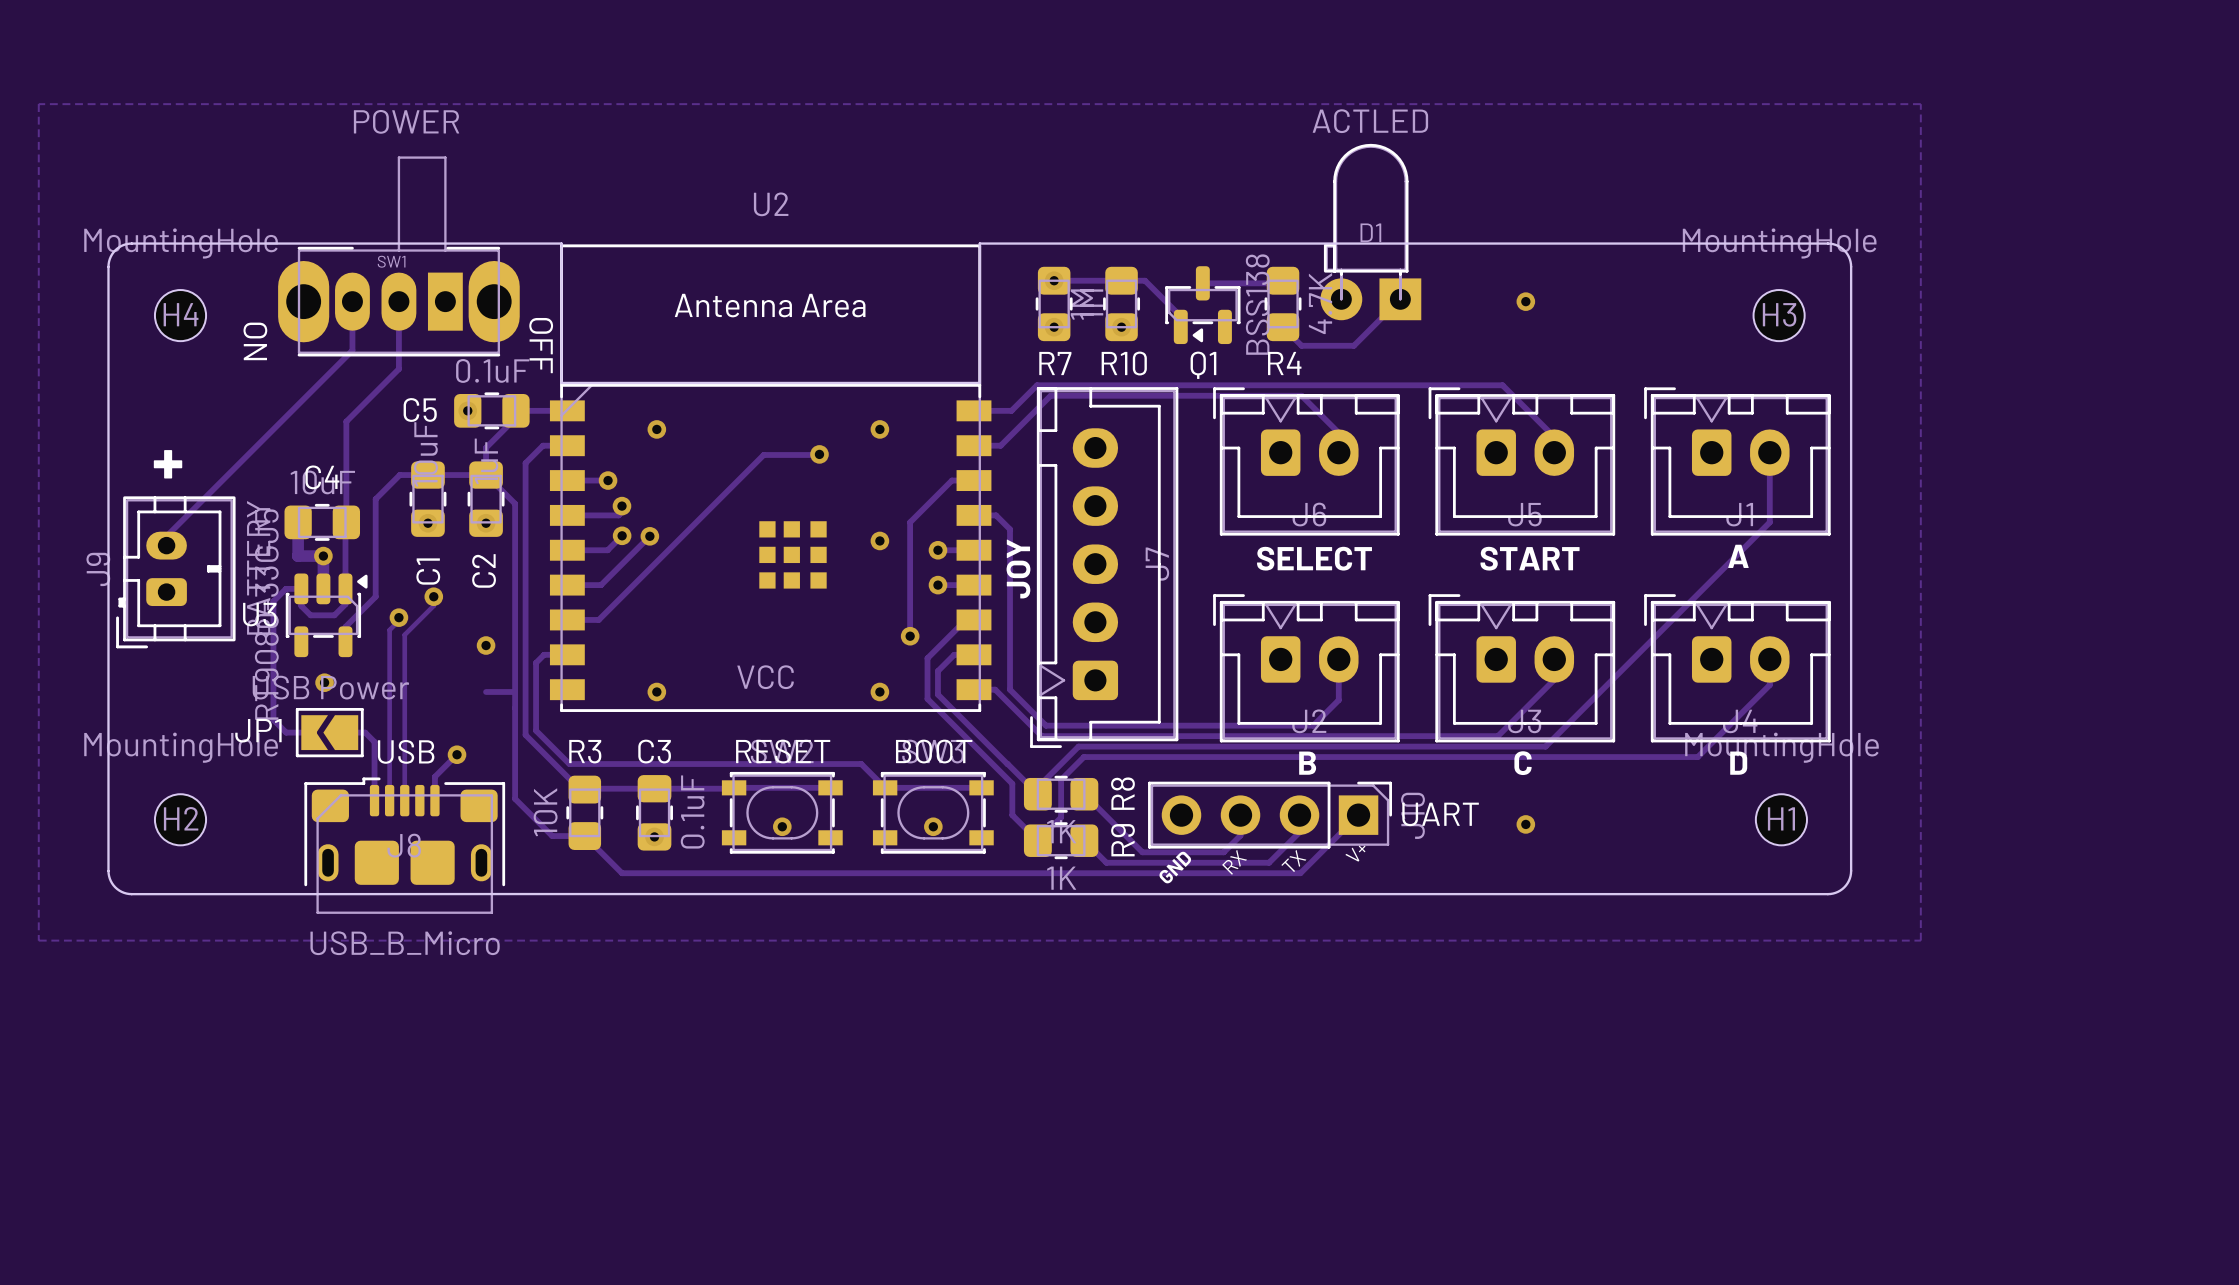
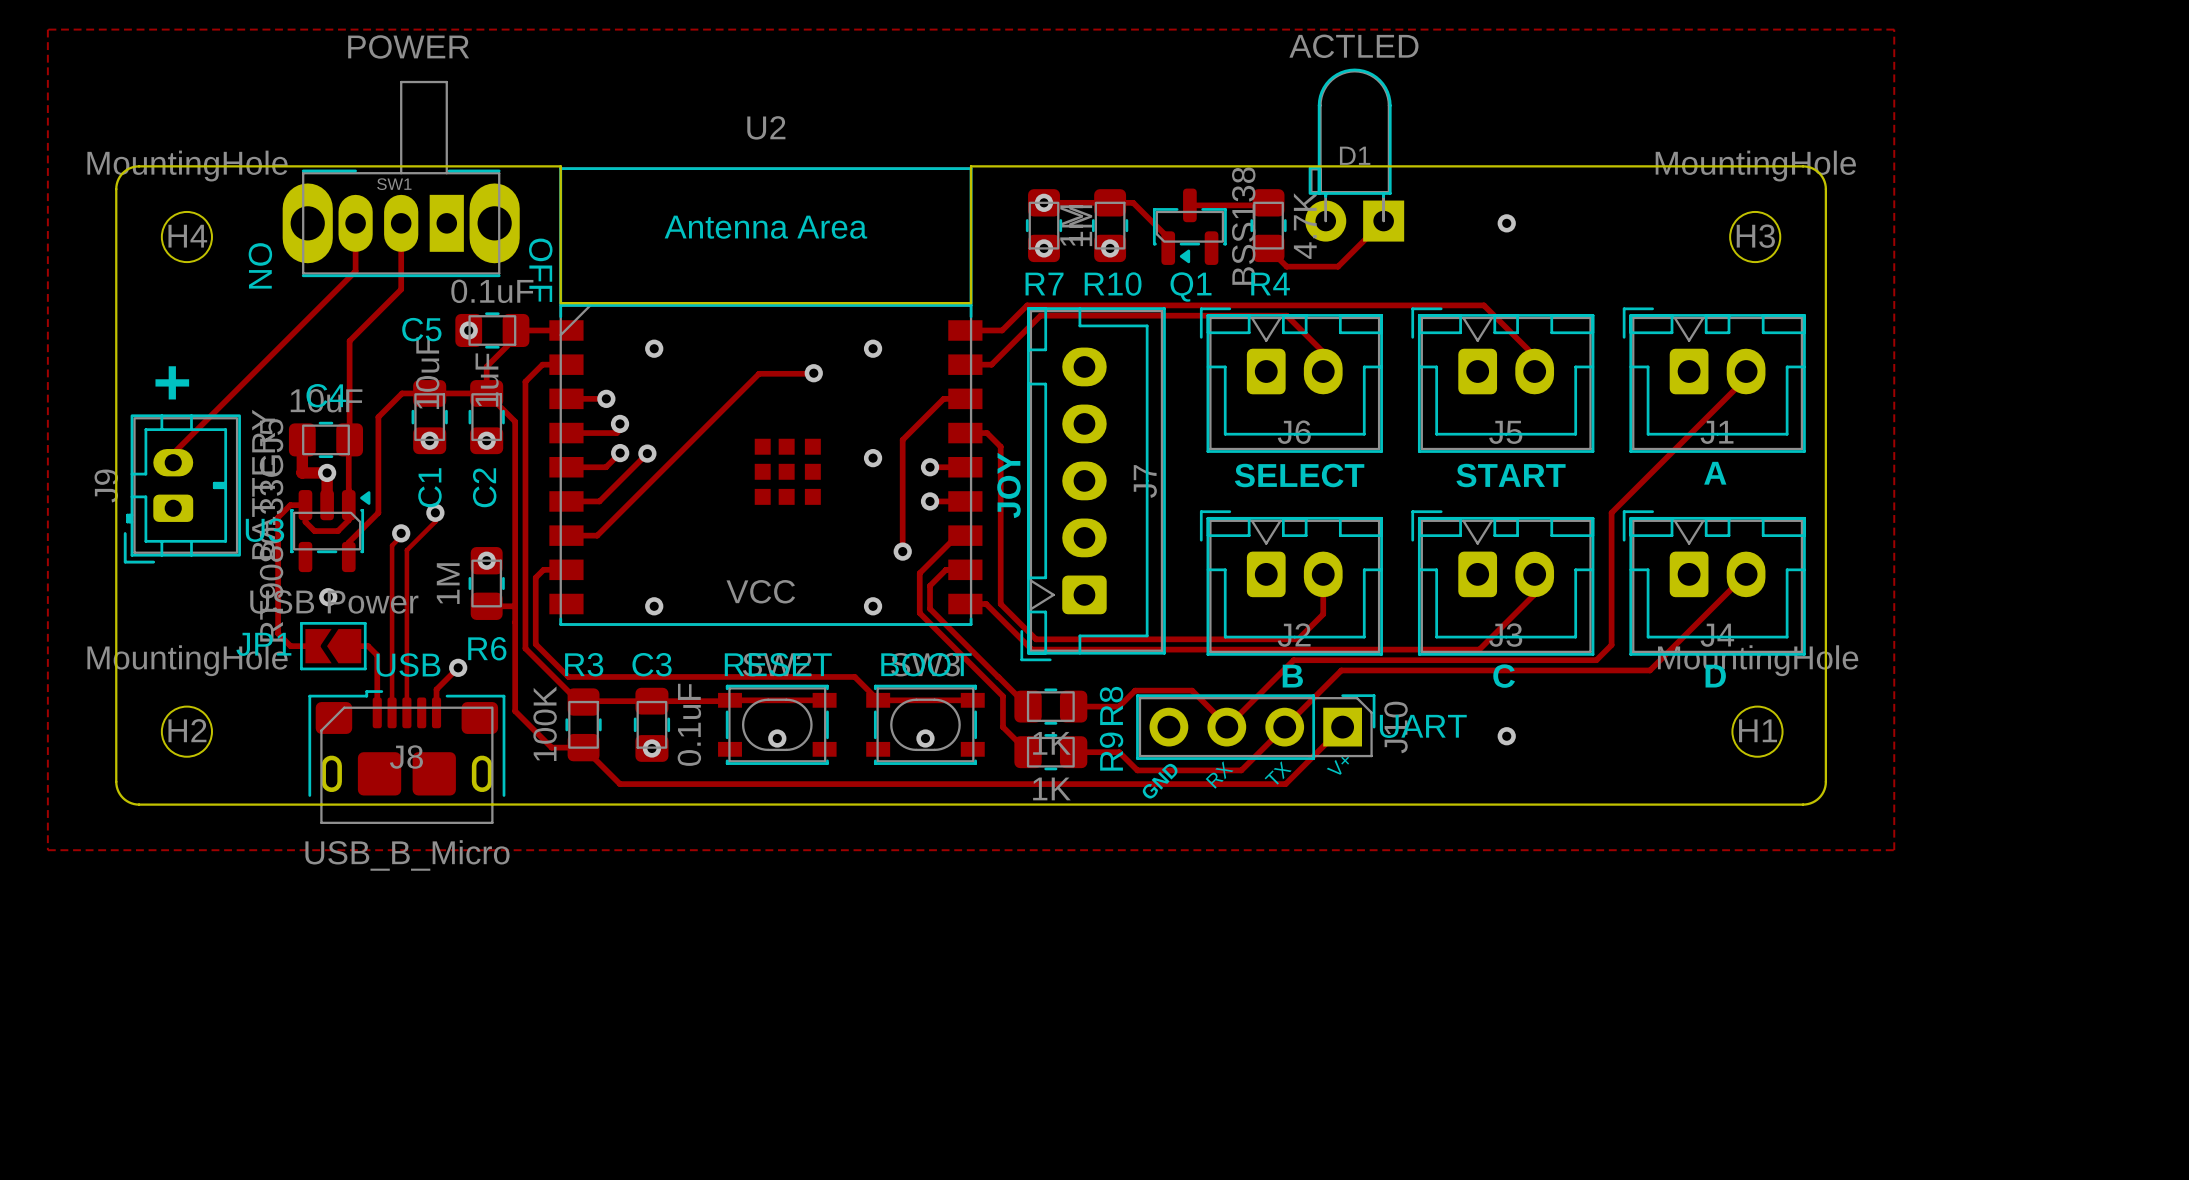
track: (1769, 459) (1769, 522) (1545, 746) (1078, 746) (1037, 787) (1037, 794) -> (1746, 378) (1611, 512) (1611, 645) (1596, 660) (1293, 660) (1226, 727) (1192, 690) (1135, 690) (1119, 706) (1073, 706)
track: (1769, 659) (1769, 685) (1697, 757) (1083, 757) (1061, 779) (1061, 817) (1037, 840) -> (1746, 574) (1650, 670) (1341, 670) (1241, 770) (1137, 770) (1130, 763)
R6: none -> 1M (486, 583)
track: (1084, 794) (1130, 840) -> (1073, 752) (1119, 752)
R3 value: 10K (545, 812) -> 100K (545, 723)
track: (1240, 815) (1240, 835) (1223, 852) (1142, 852) -> none
track: (1299, 815) (1299, 832) (1269, 862) (1106, 862) (1084, 840) -> none

